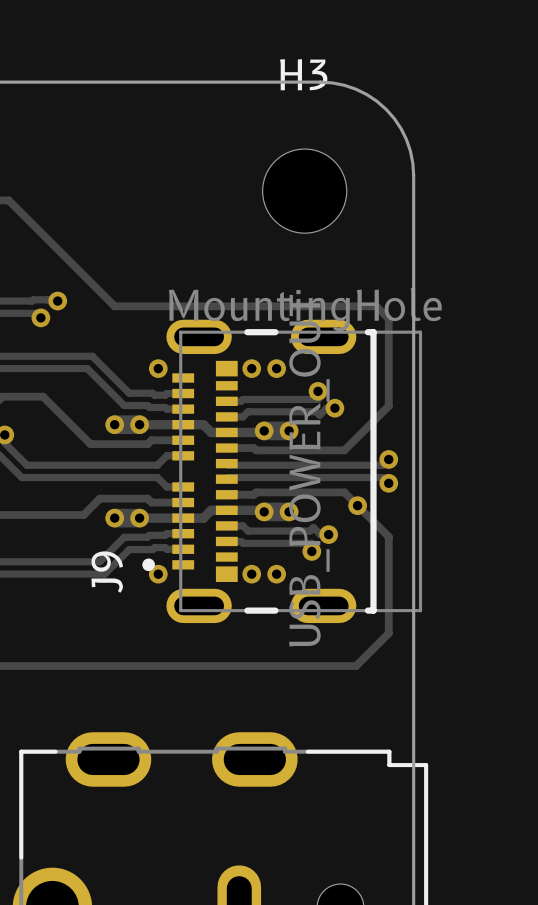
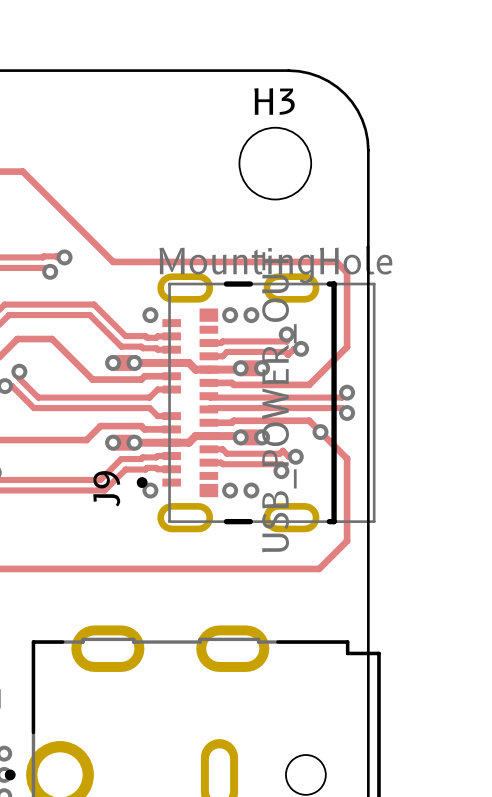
H3 name position: H3 (303, 74) -> H3 (274, 101)

